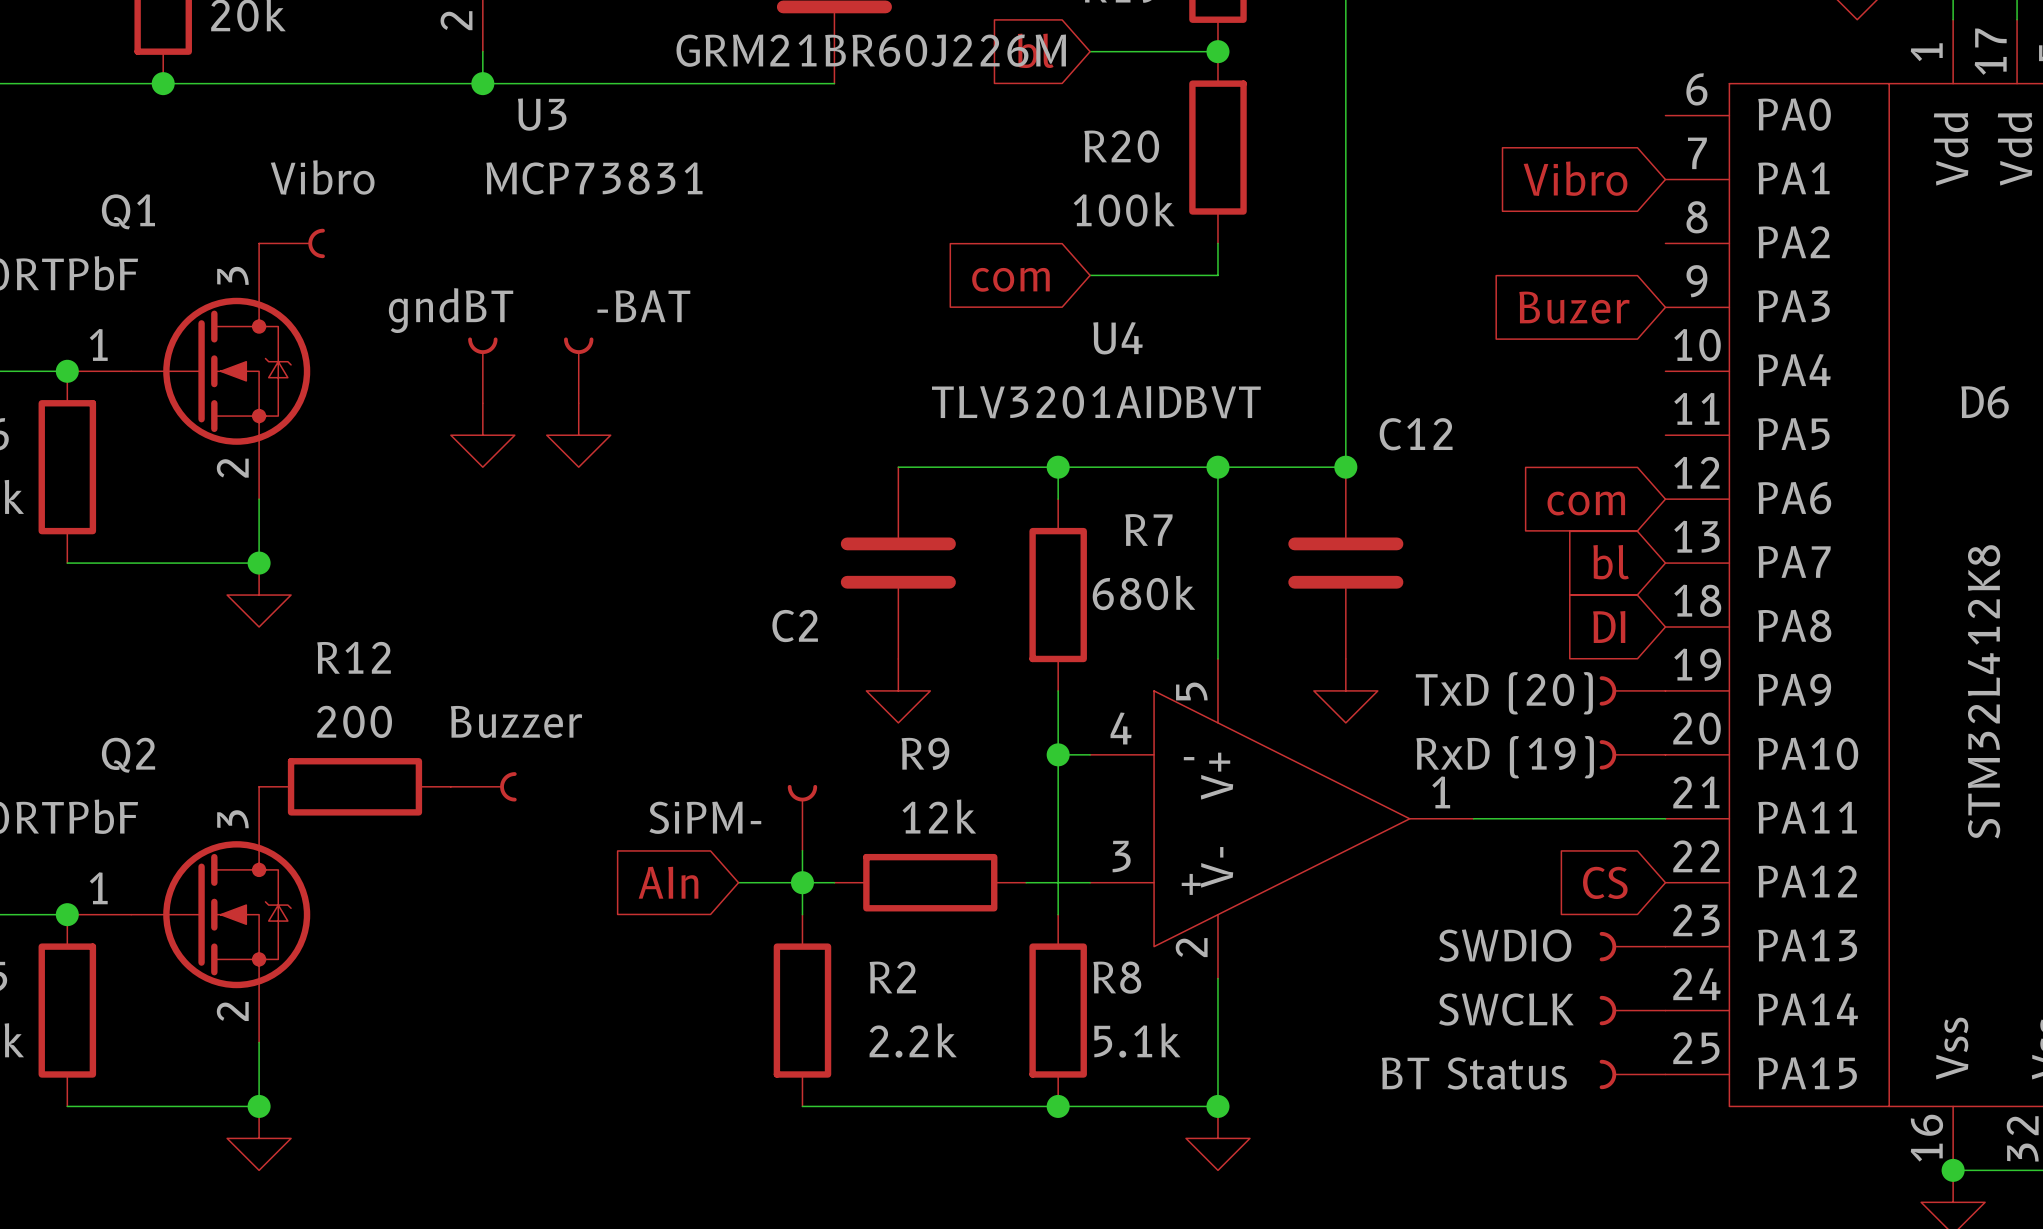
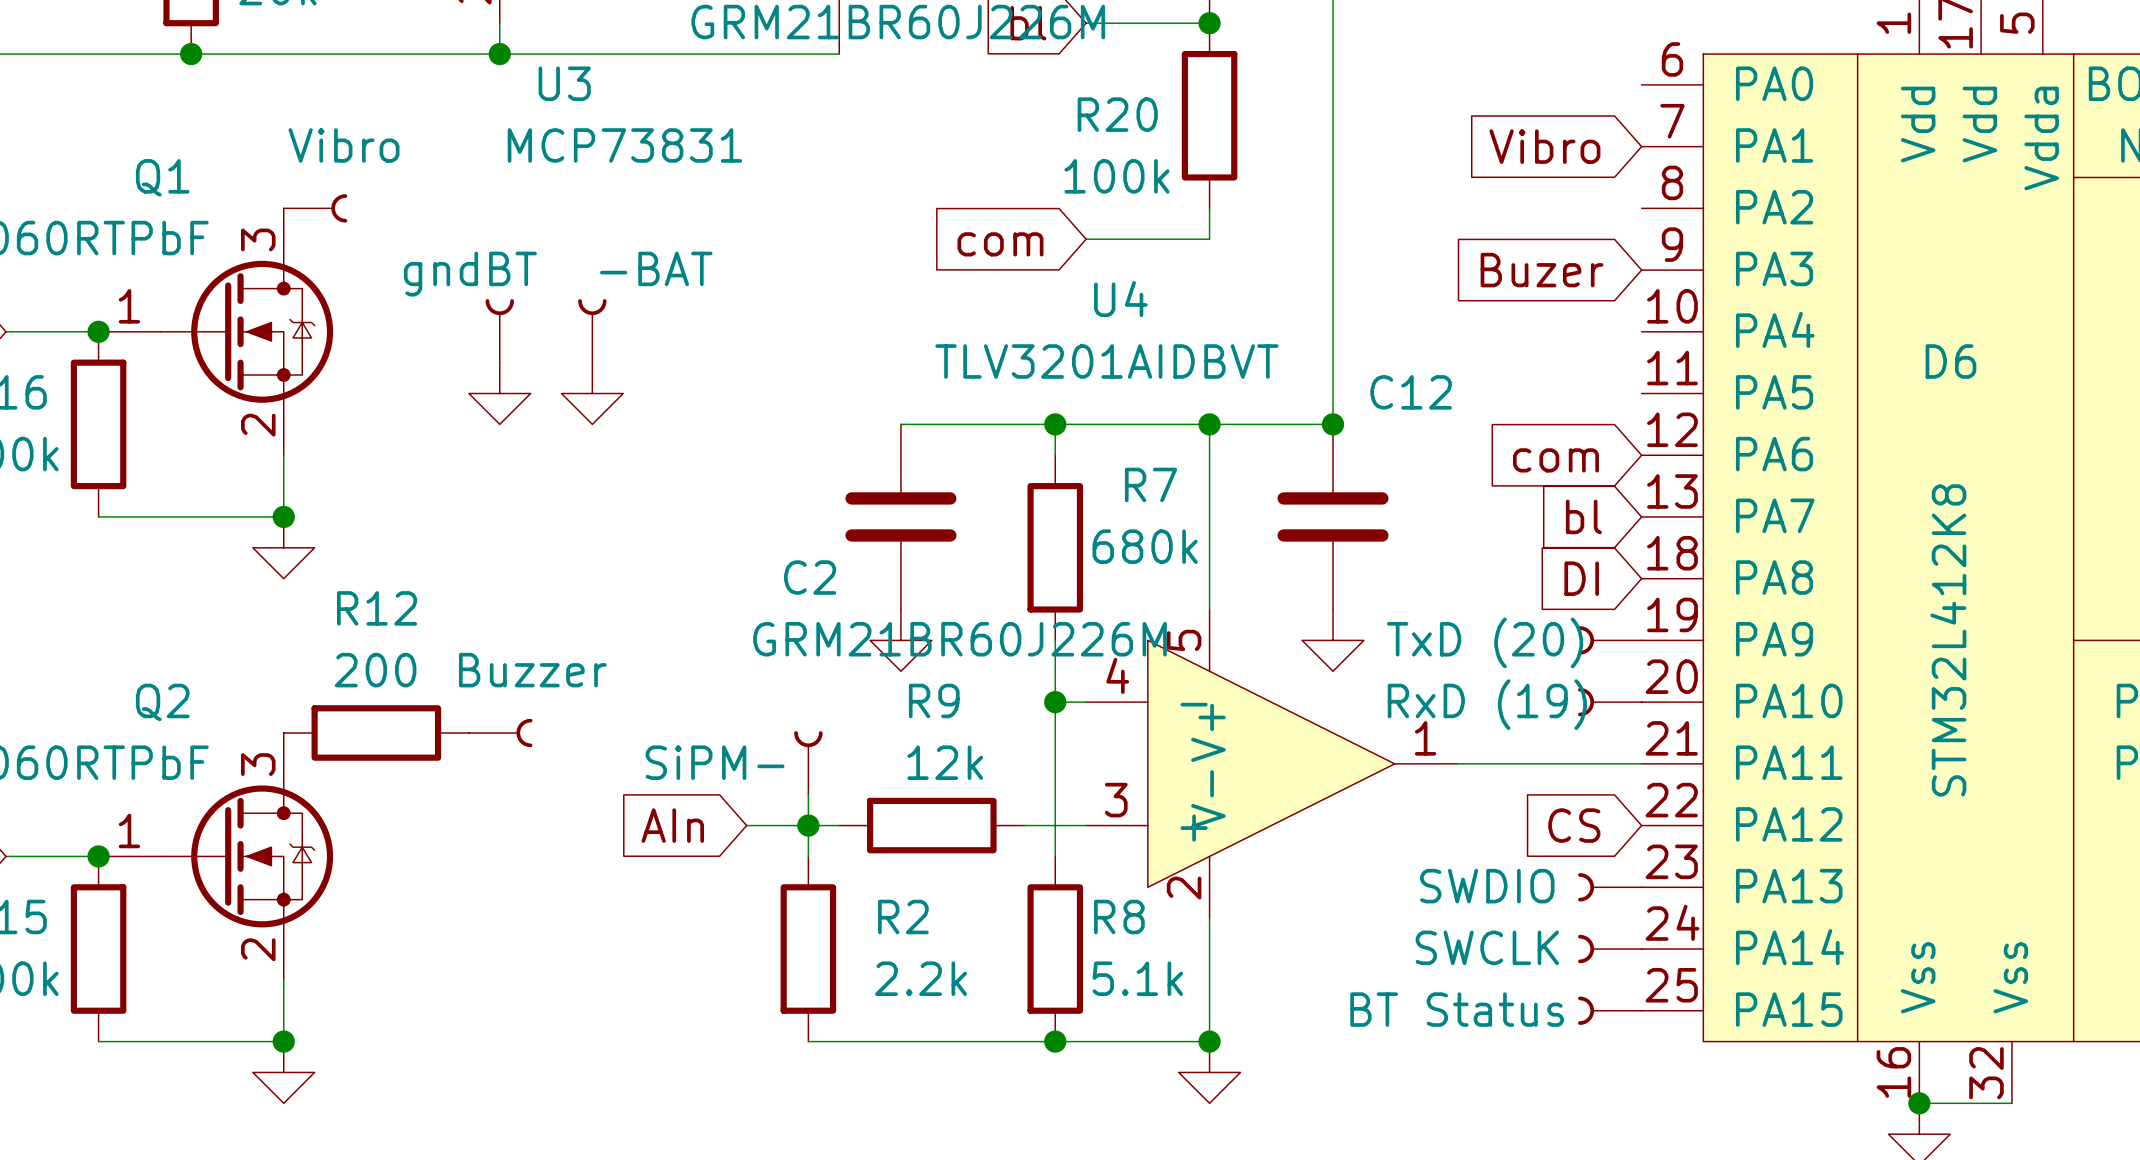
C2 value: none -> GRM21BR60J226M (959, 639)

